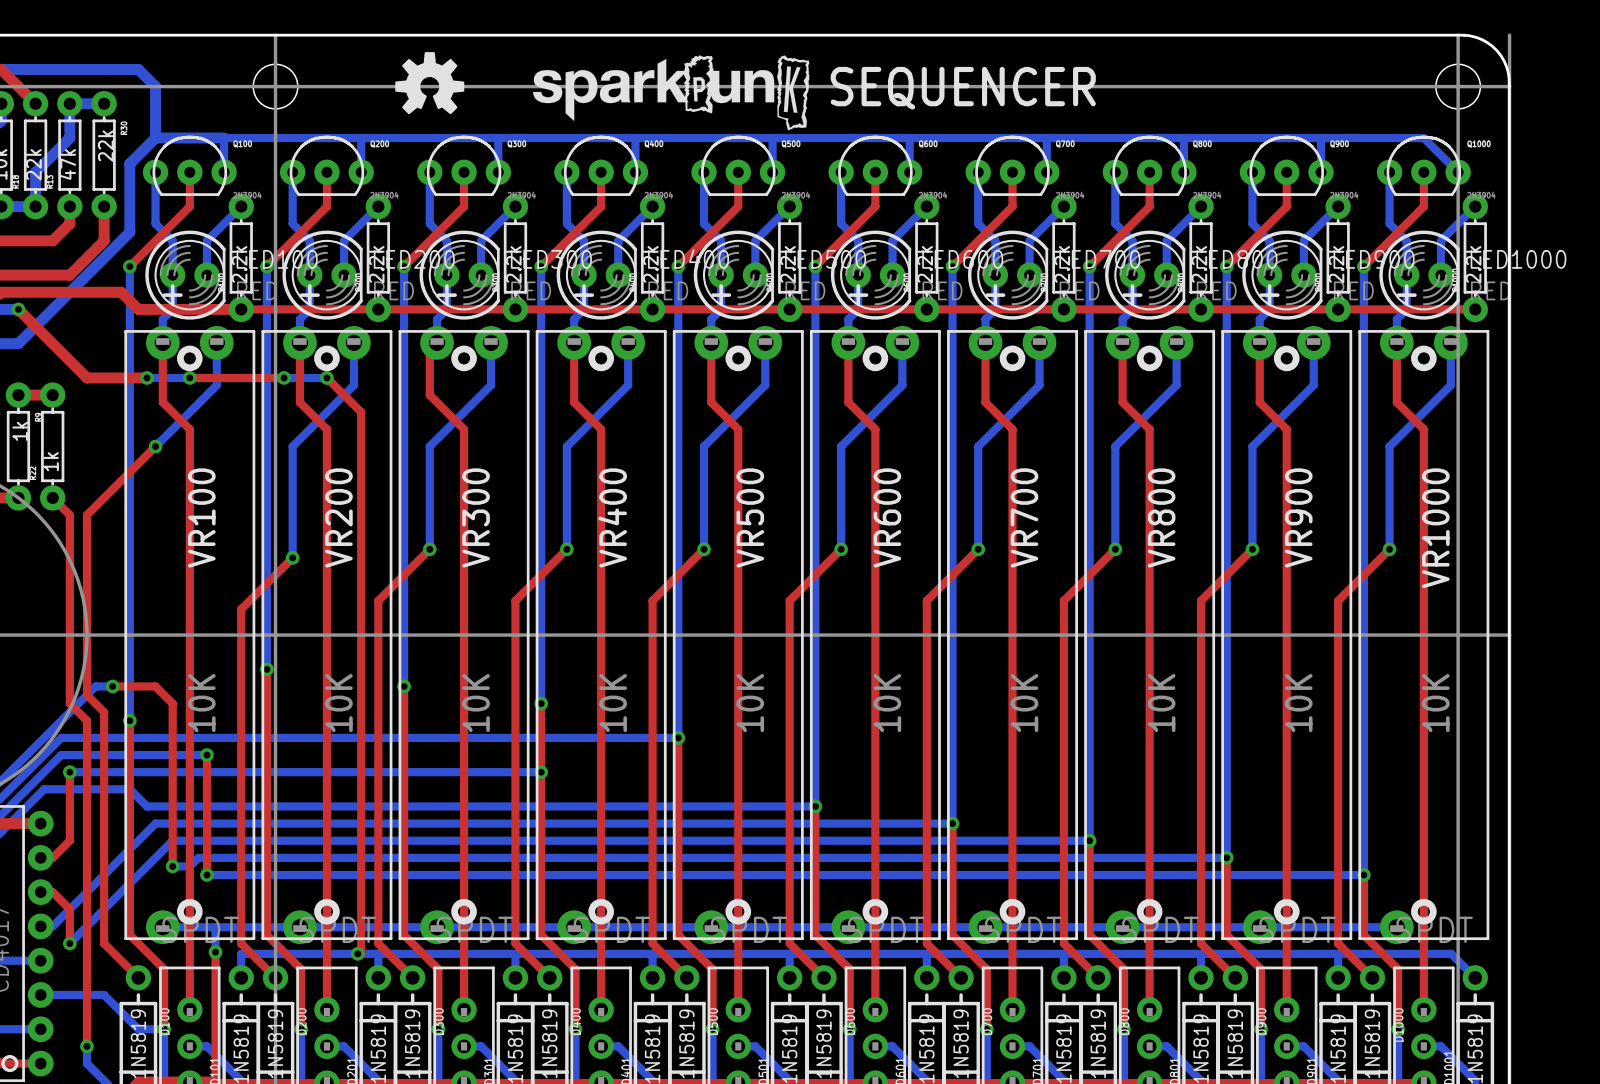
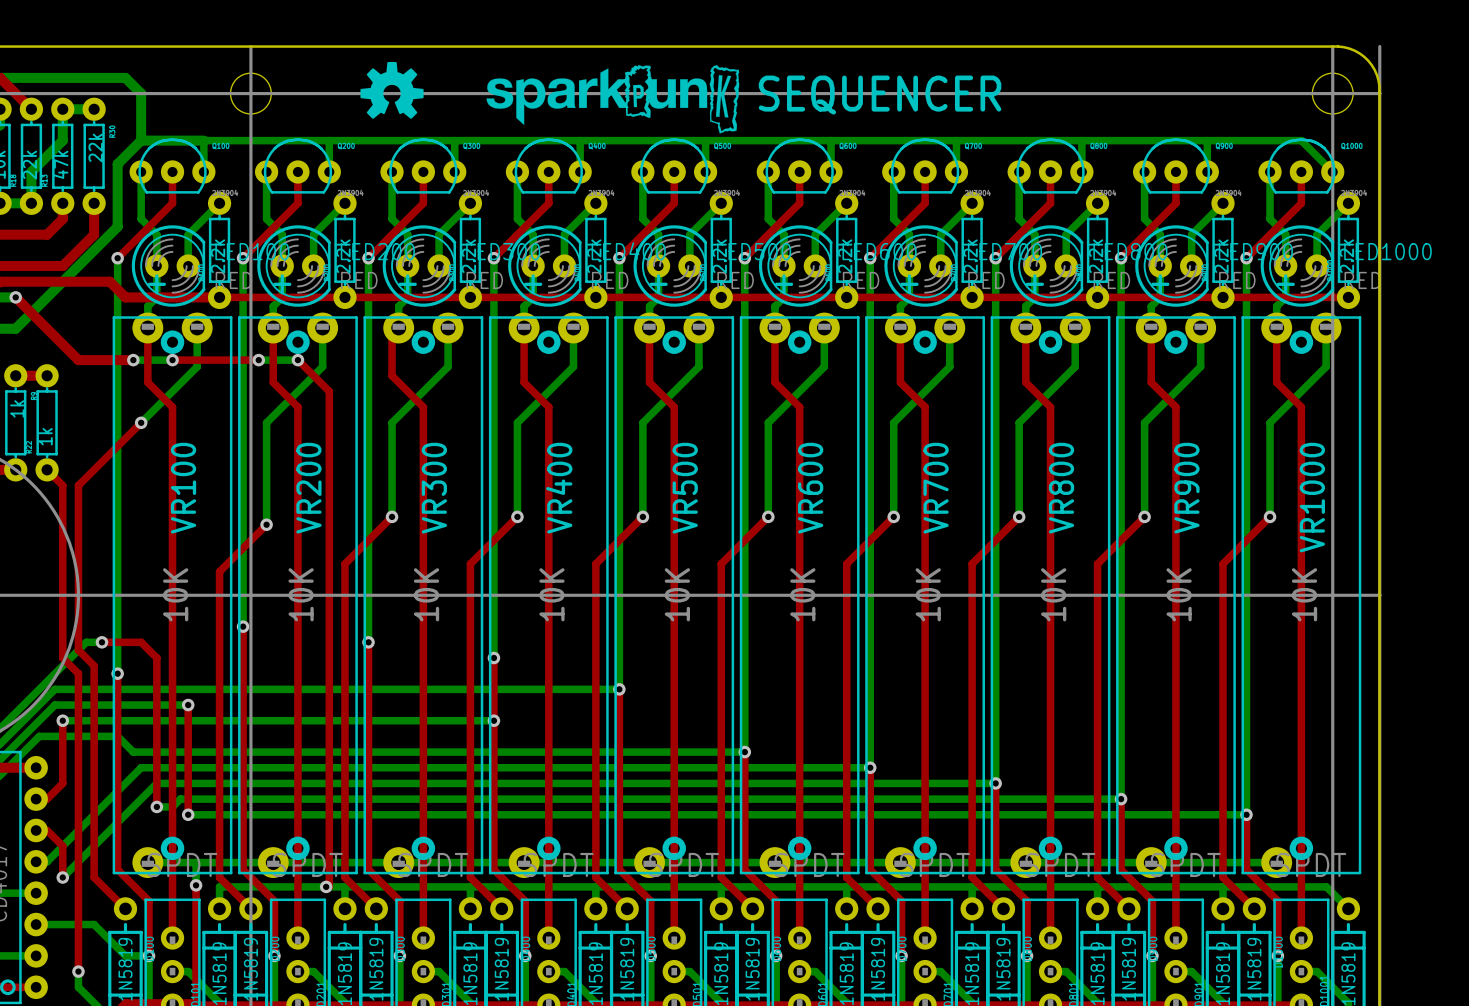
VR100 value position: 10K (201, 703) -> 10K (175, 594)
VR200 value position: 10K (338, 703) -> 10K (301, 594)
VR300 value position: 10K (476, 703) -> 10K (426, 594)
VR400 value position: 10K (613, 703) -> 10K (551, 594)
VR500 value position: 10K (750, 703) -> 10K (677, 594)
VR600 value position: 10K (887, 703) -> 10K (802, 594)
VR700 value position: 10K (1024, 703) -> 10K (928, 594)
VR800 value position: 10K (1161, 703) -> 10K (1053, 594)
VR900 value position: 10K (1298, 703) -> 10K (1179, 594)
VR1000 value position: 10K (1435, 703) -> 10K (1304, 594)

